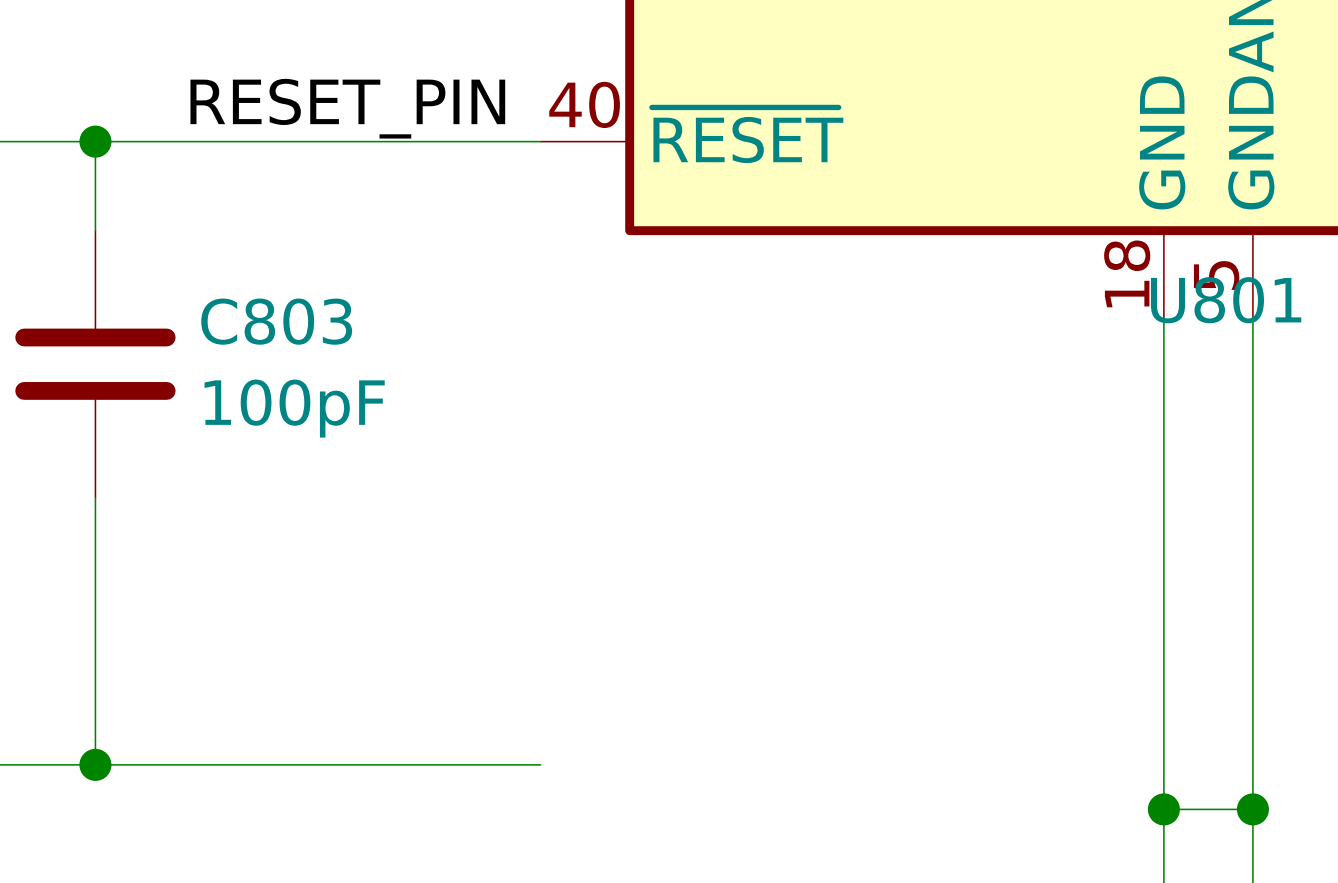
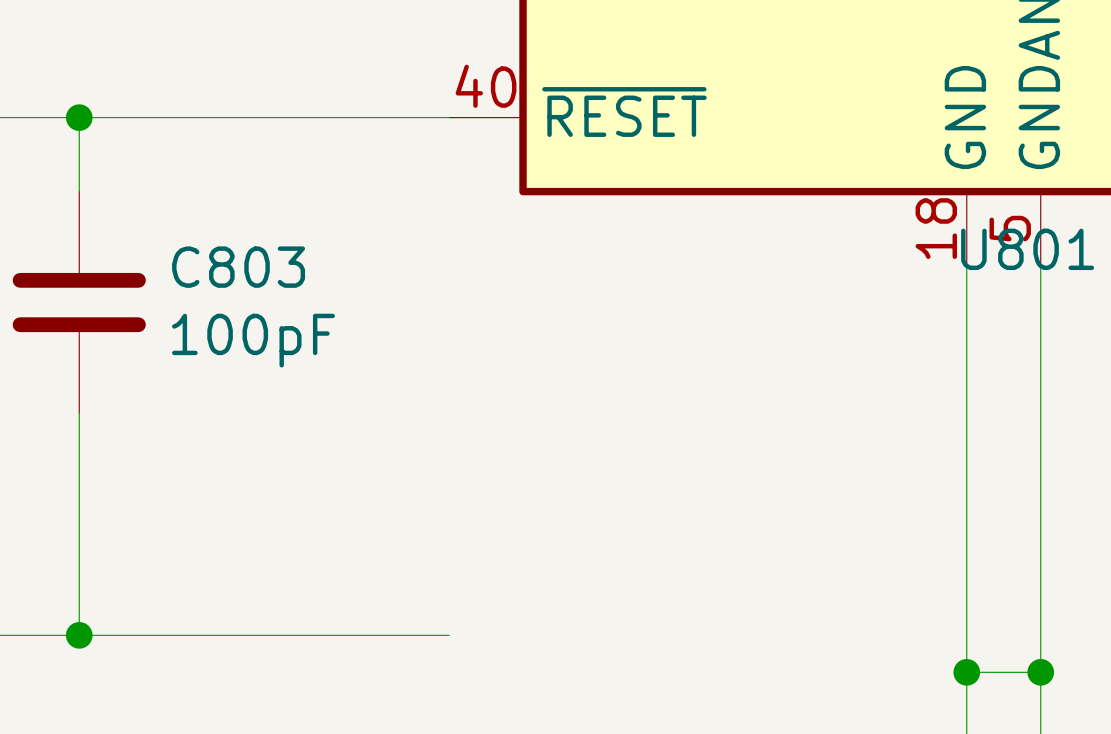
label: RESET_PIN (347, 108) -> none

